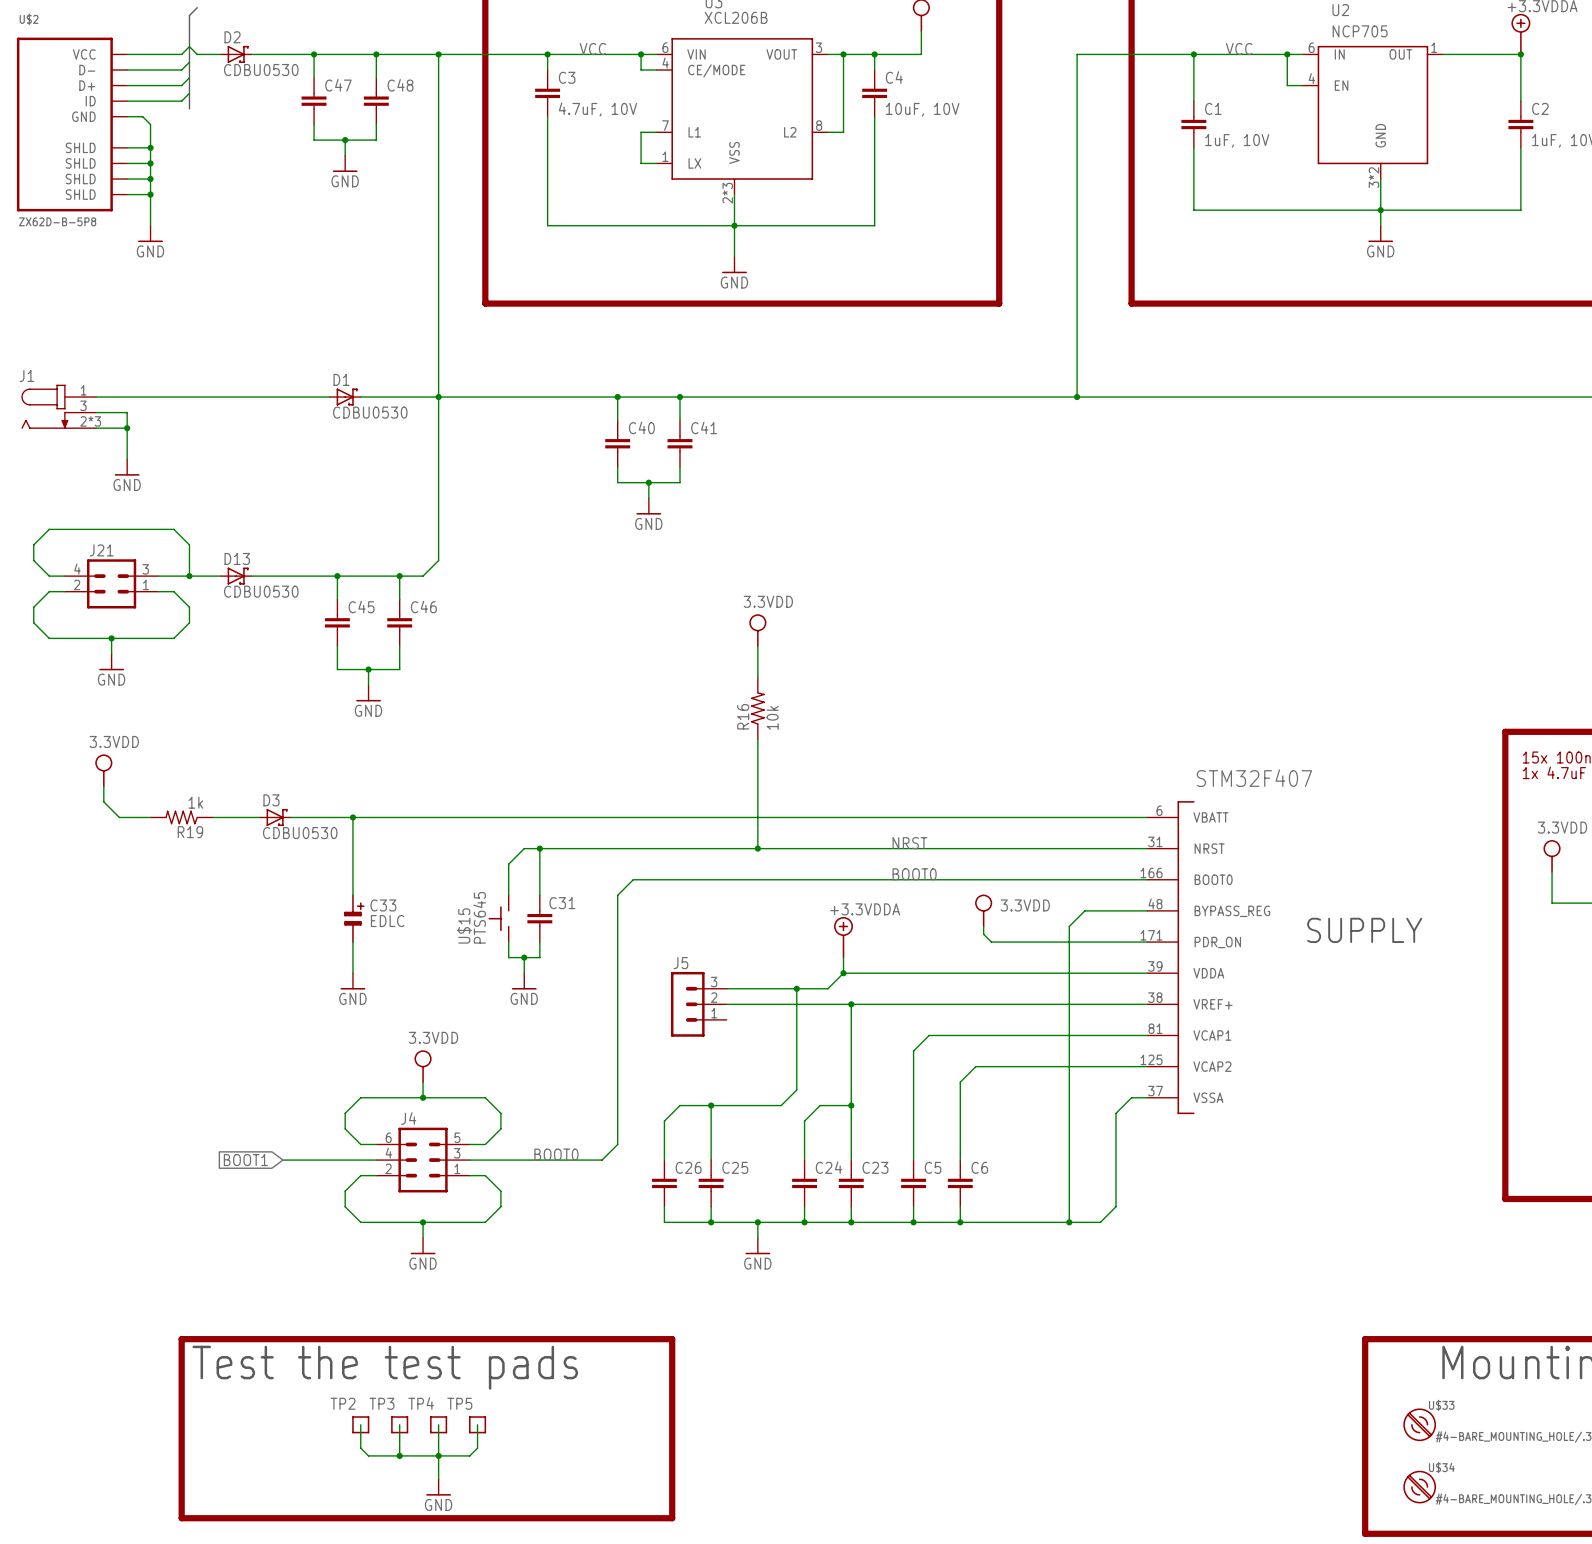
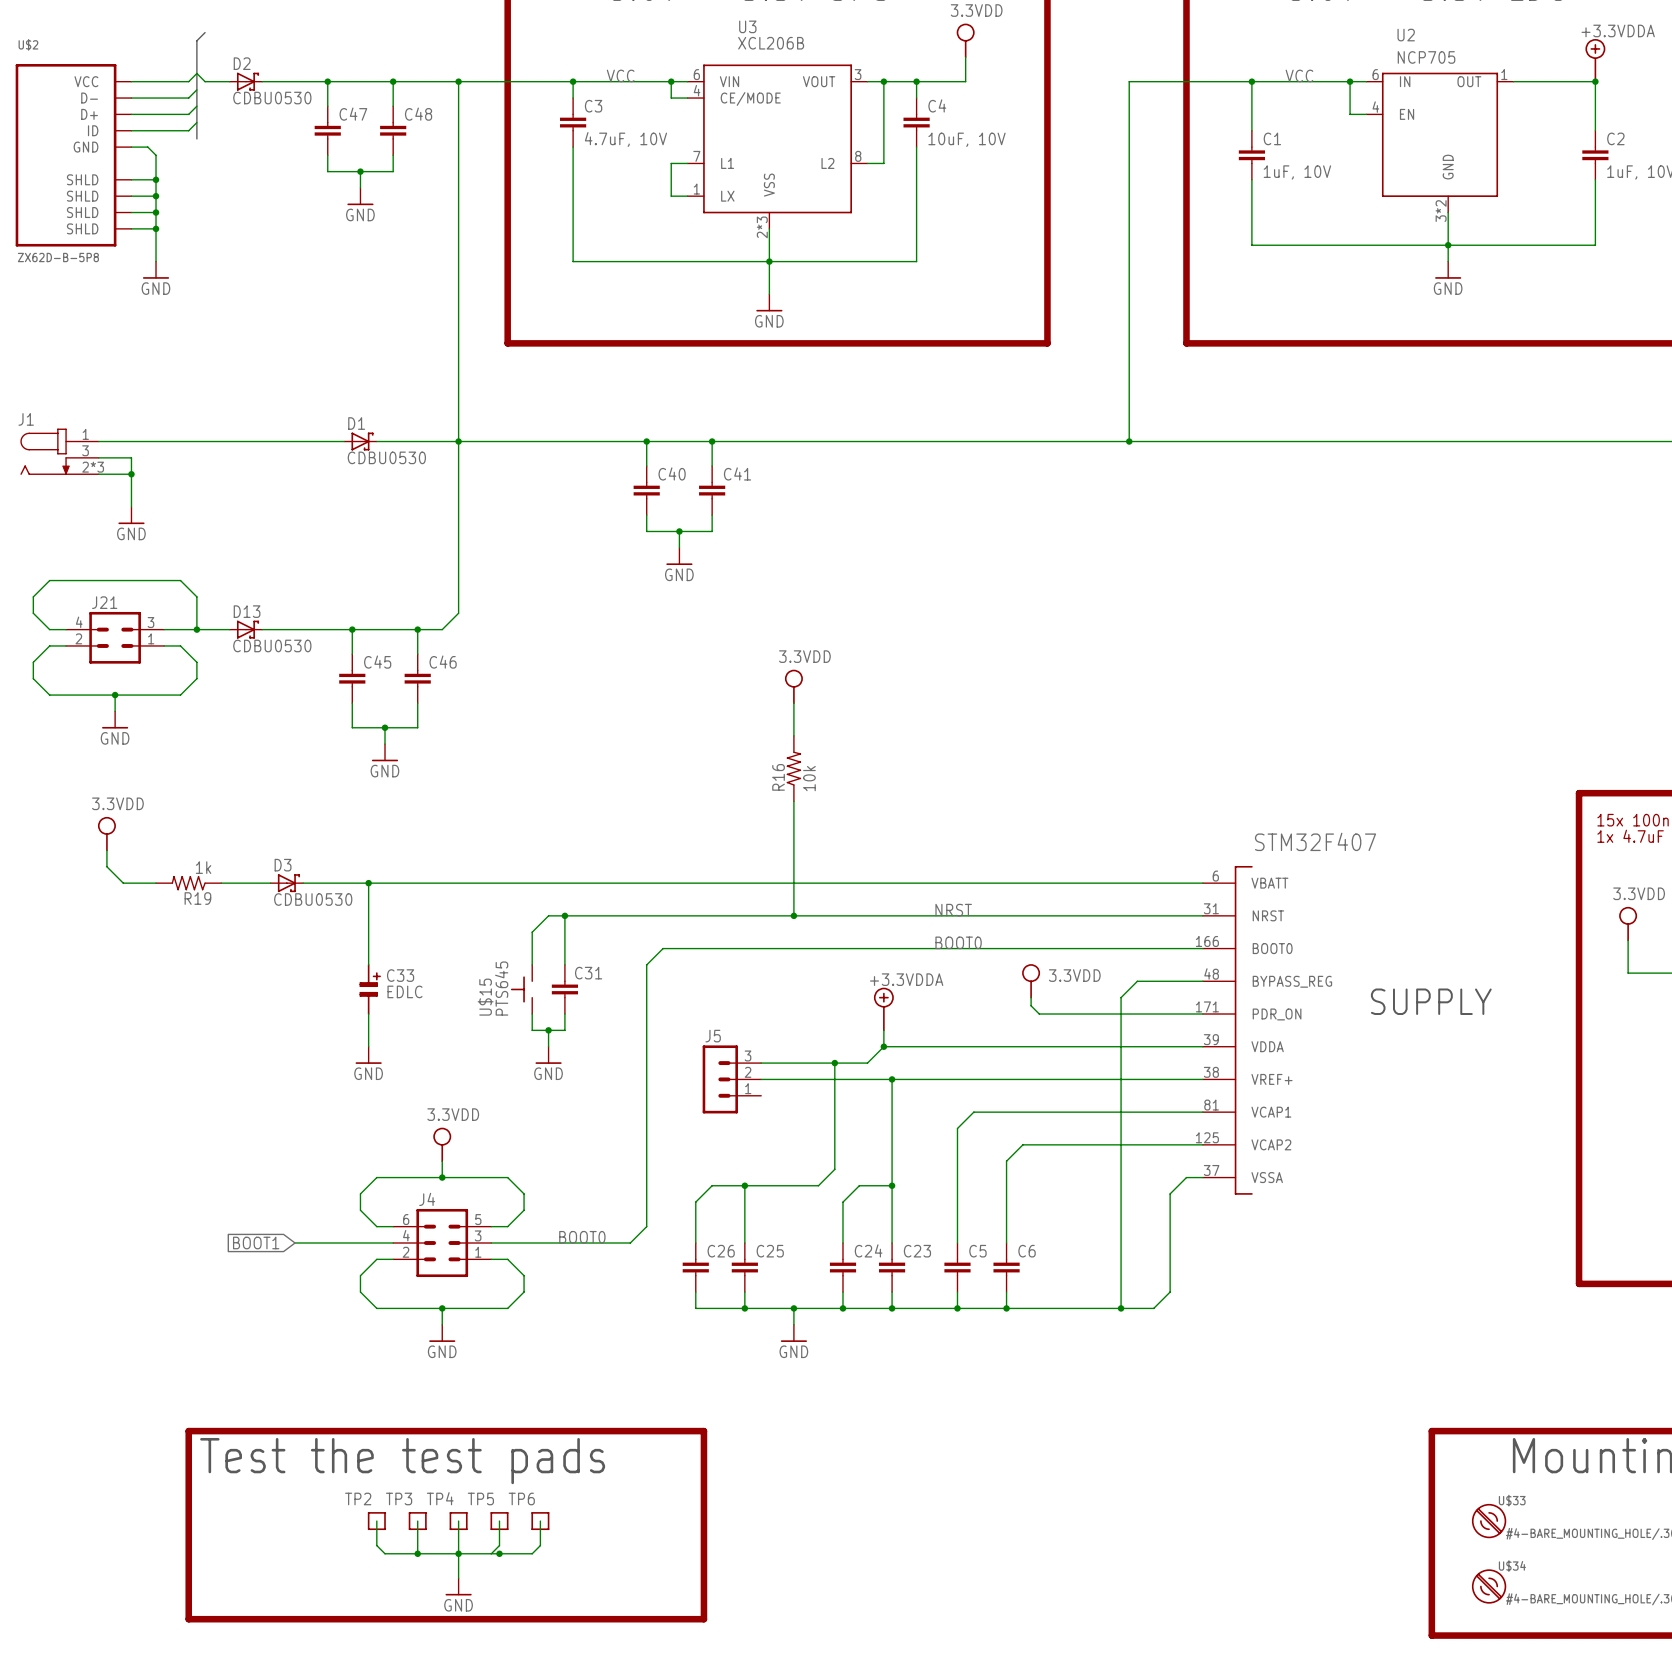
wire: none -> (540, 1521) (540, 1545) (532, 1553) (491, 1553)
TP6: none -> (540, 1521)
junction: none -> (499, 1553)

